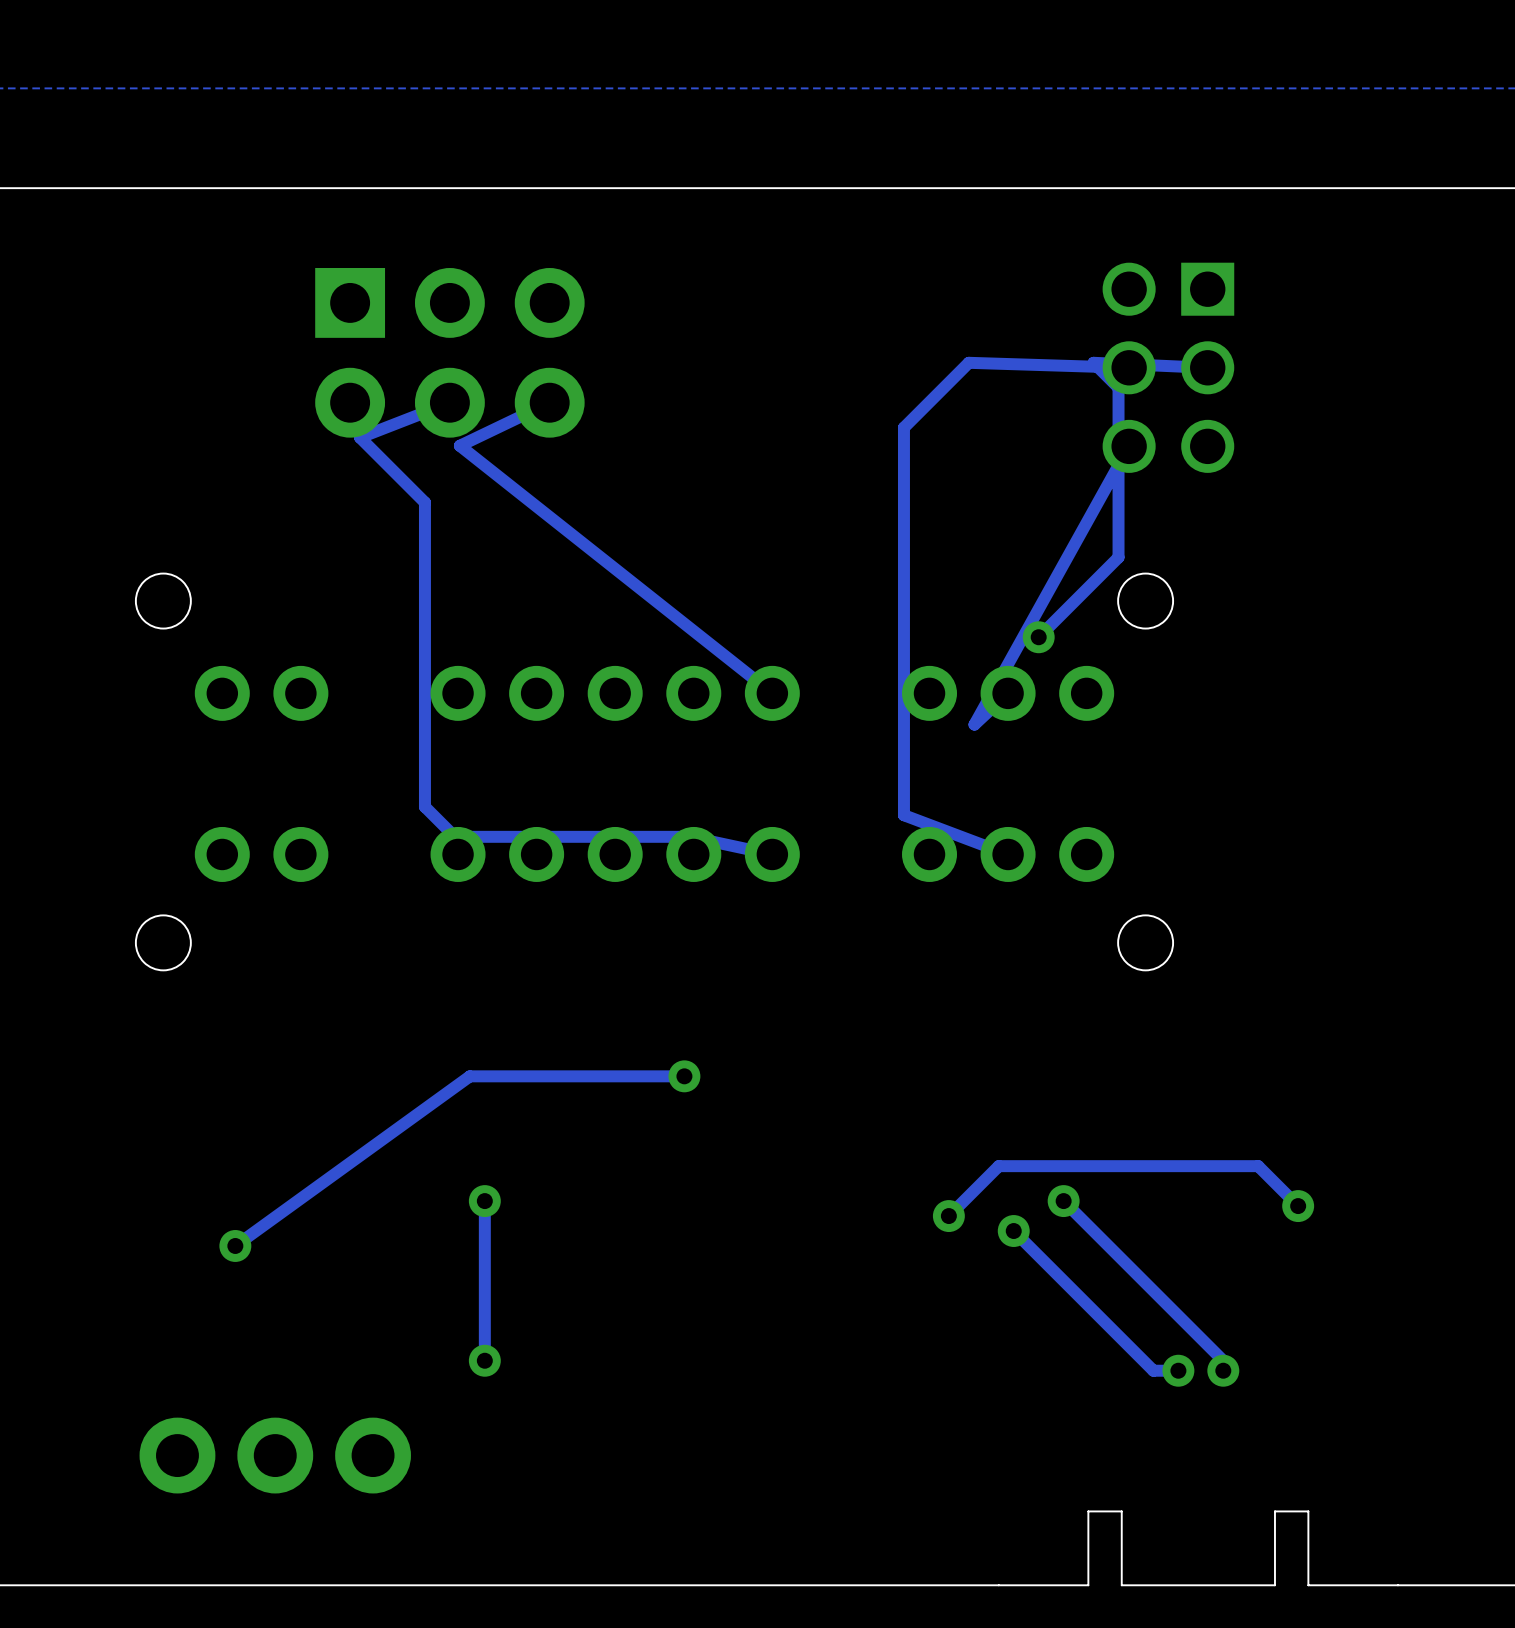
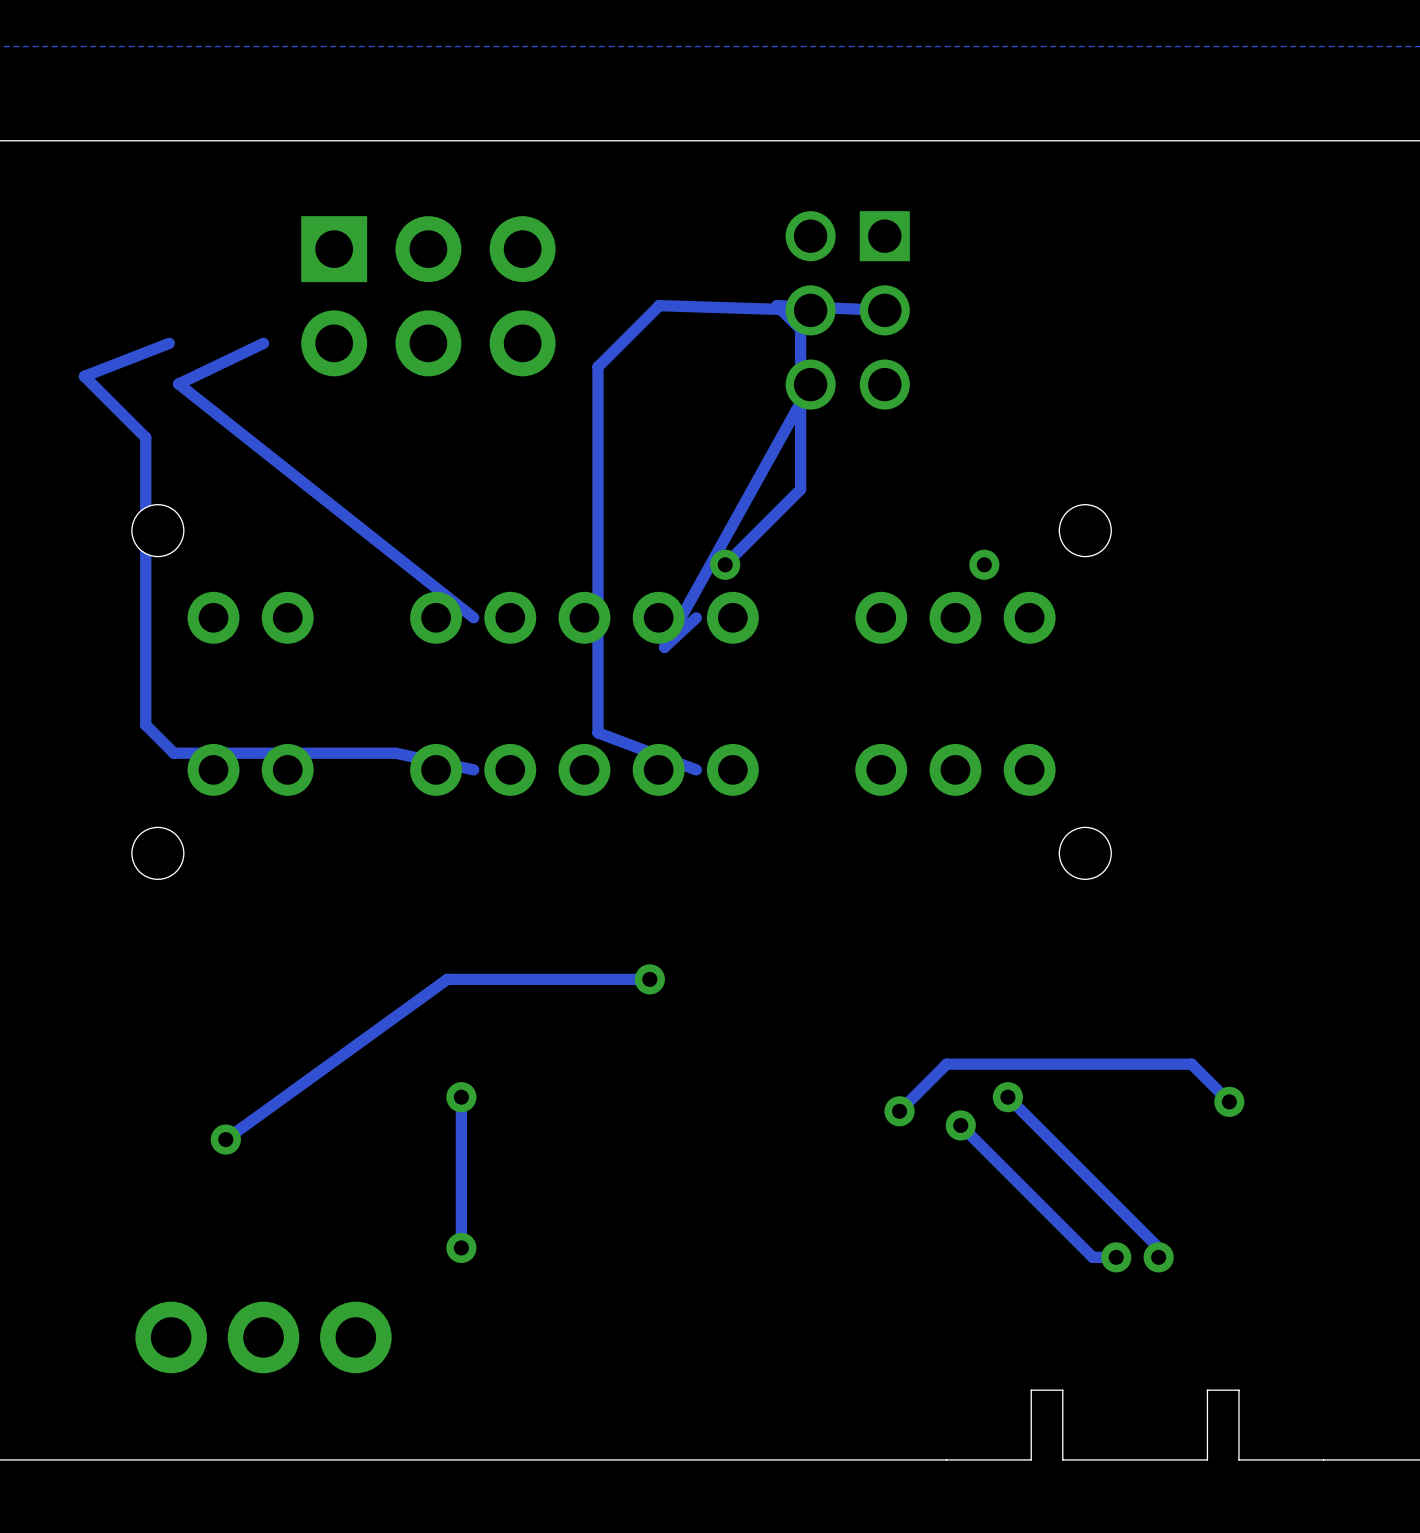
track: (1129, 367) (968, 362) (903, 427) (903, 815) (1008, 854) -> (810, 310) (659, 305) (598, 366) (598, 732) (696, 769)
part position: (1168, 367) -> (847, 310)
track: (1207, 367) (1093, 362) (1118, 387) (1118, 557) (1038, 637) -> (884, 310) (777, 305) (800, 329) (800, 489) (725, 564)
track: (449, 402) (360, 437) (424, 502) (424, 806) (454, 836) (689, 836) (772, 854) -> (169, 343) (84, 376) (145, 437) (145, 724) (174, 753) (395, 753) (473, 769)
track: (549, 402) (459, 445) (772, 693) -> (263, 343) (178, 384) (473, 617)
track: (1129, 446) (974, 724) (1008, 693) -> (810, 384) (664, 647) (696, 617)
via: none -> (725, 564)

